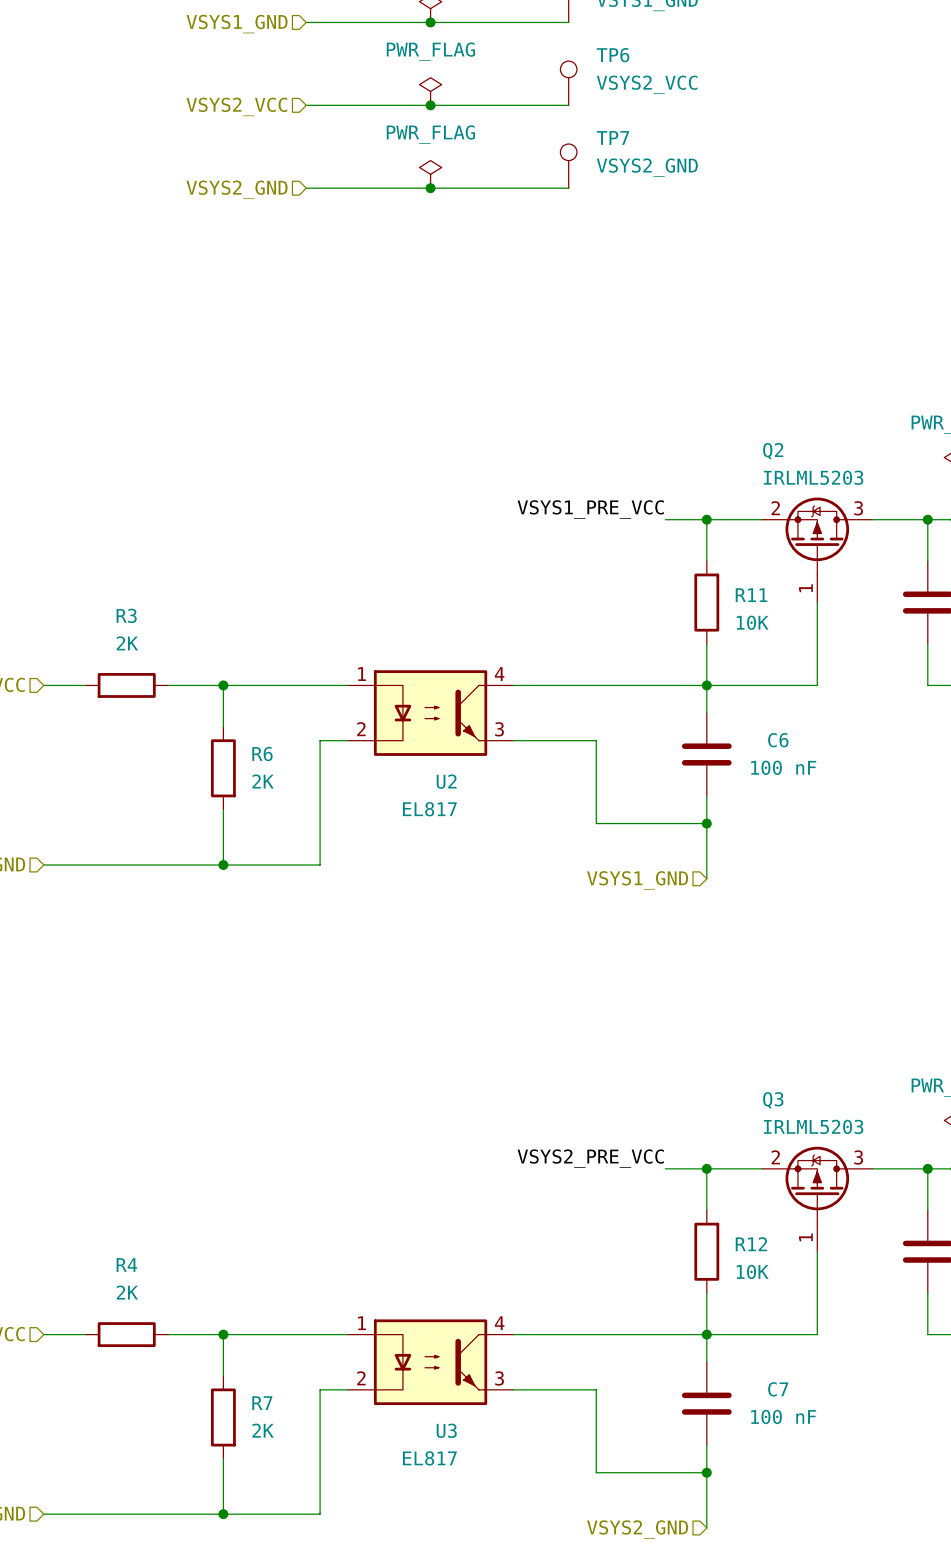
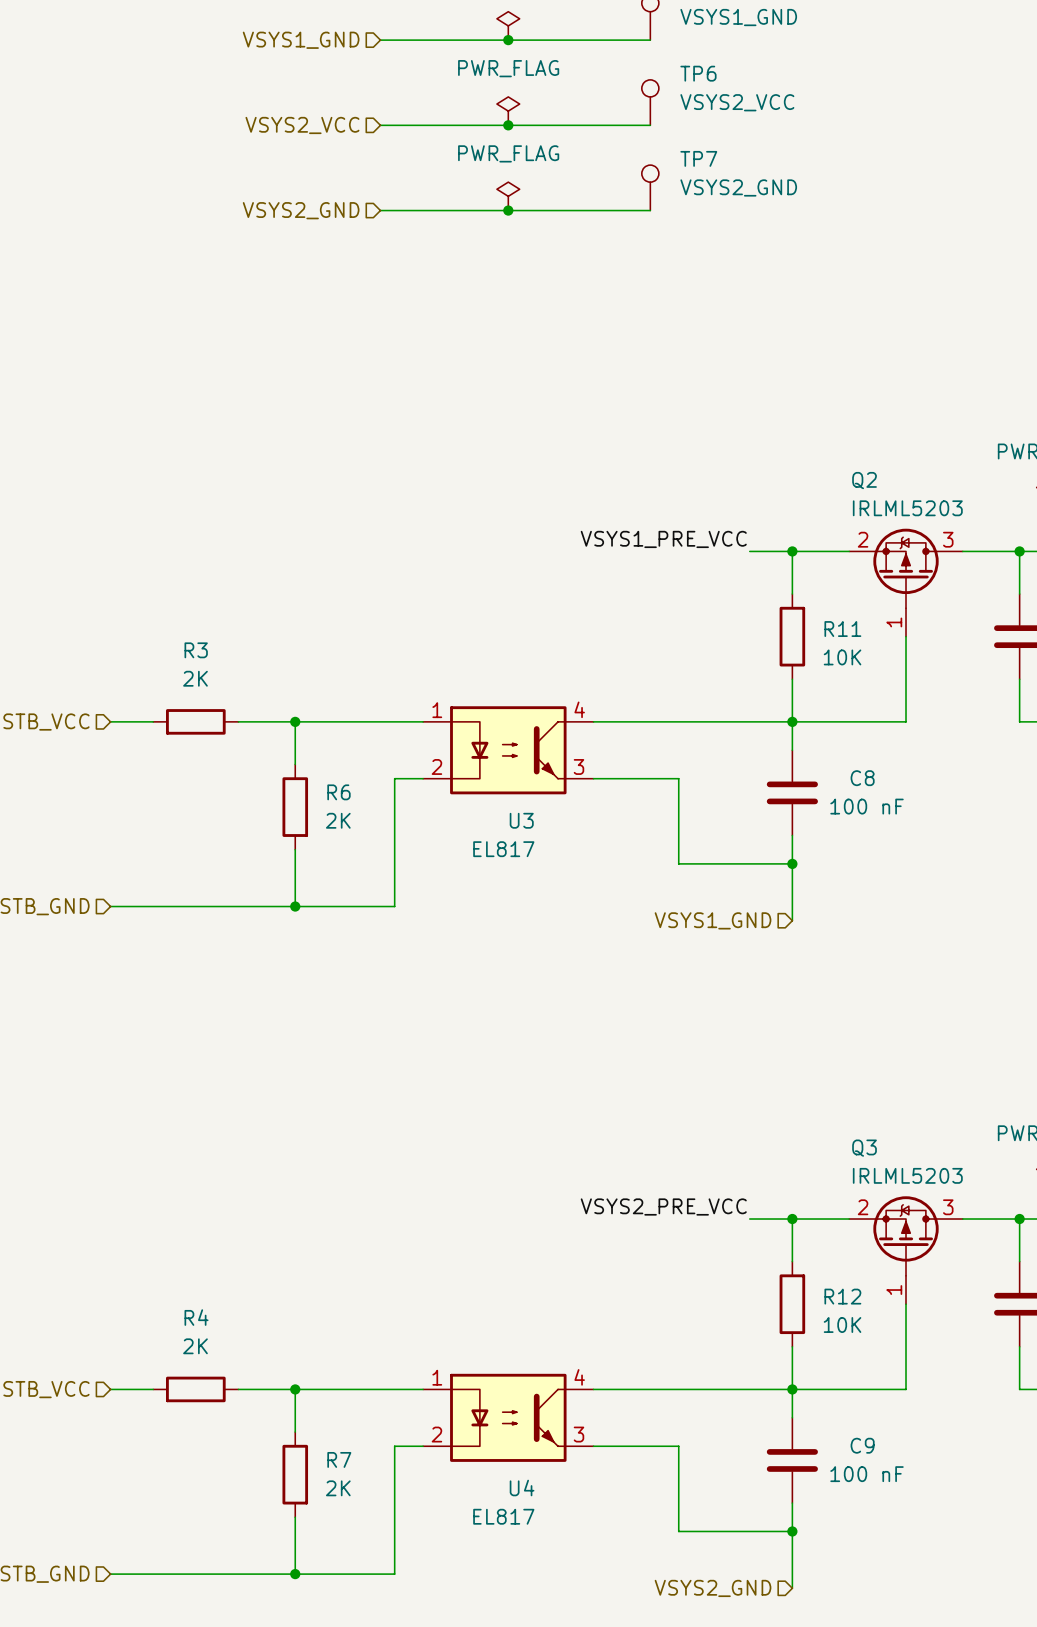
C6 name: C6 (778, 740) -> C8 (862, 778)
U2 name: U2 (446, 781) -> U3 (521, 820)
C7 name: C7 (778, 1389) -> C9 (862, 1445)
U3 name: U3 (446, 1430) -> U4 (522, 1488)

